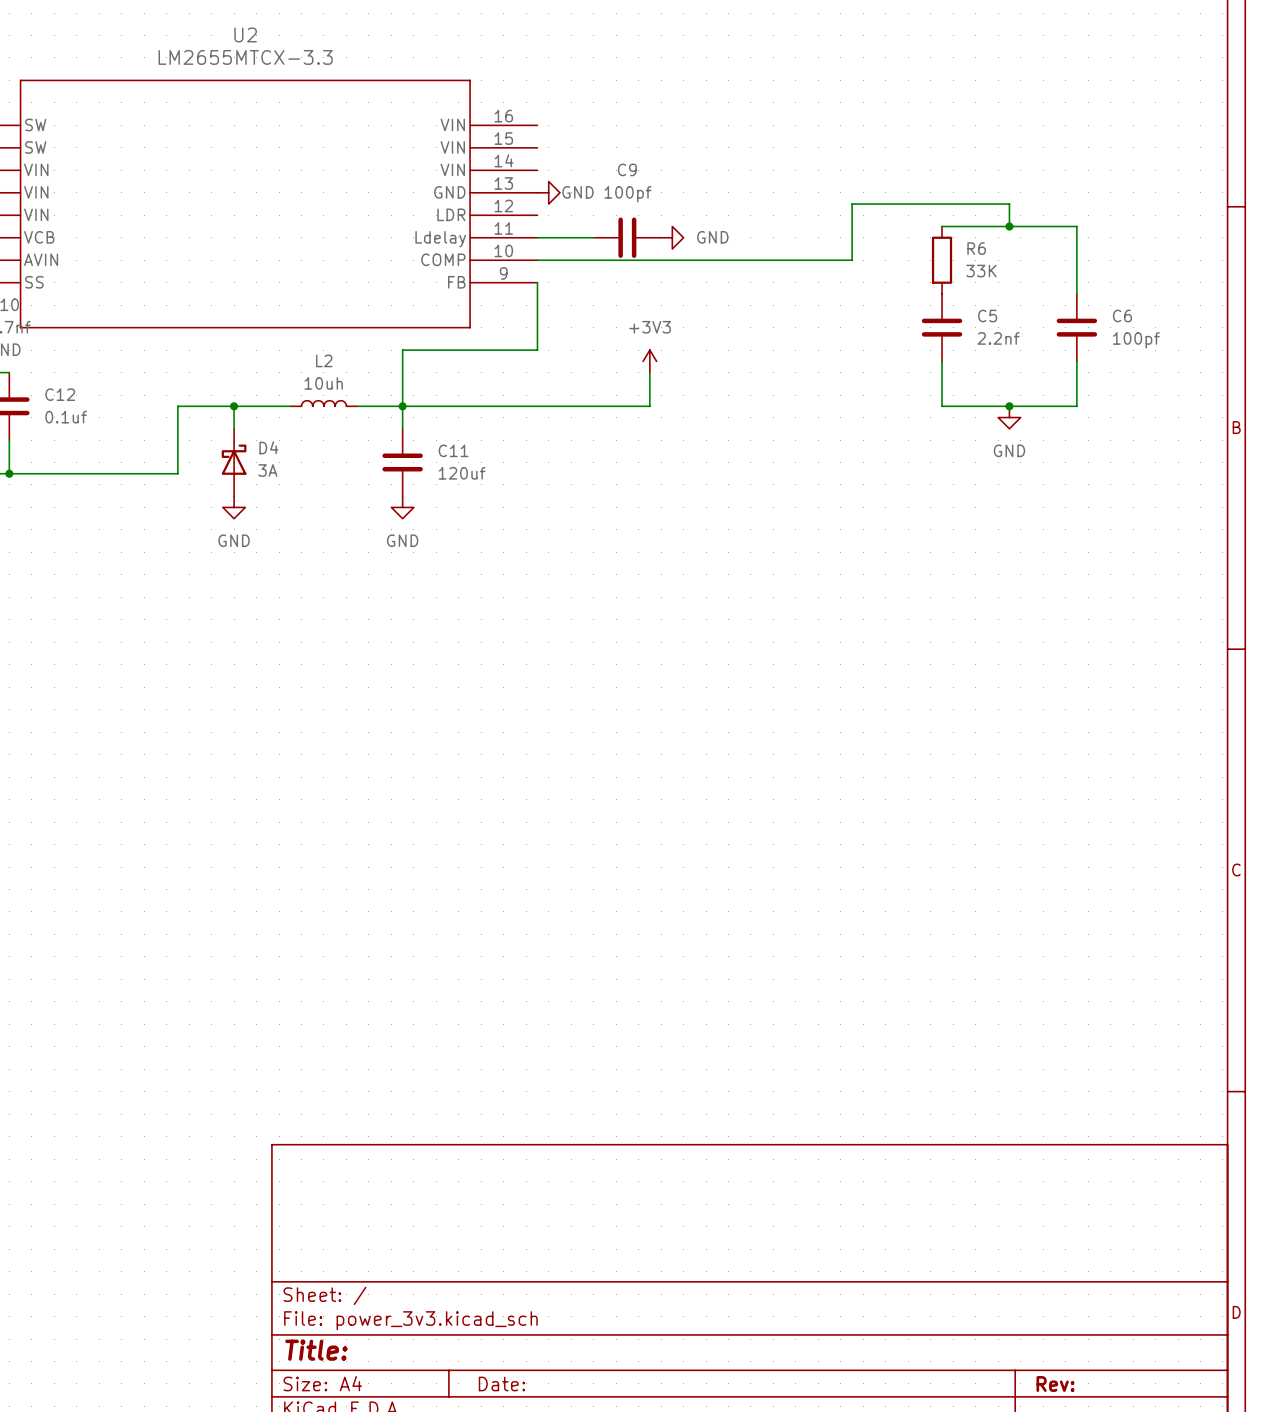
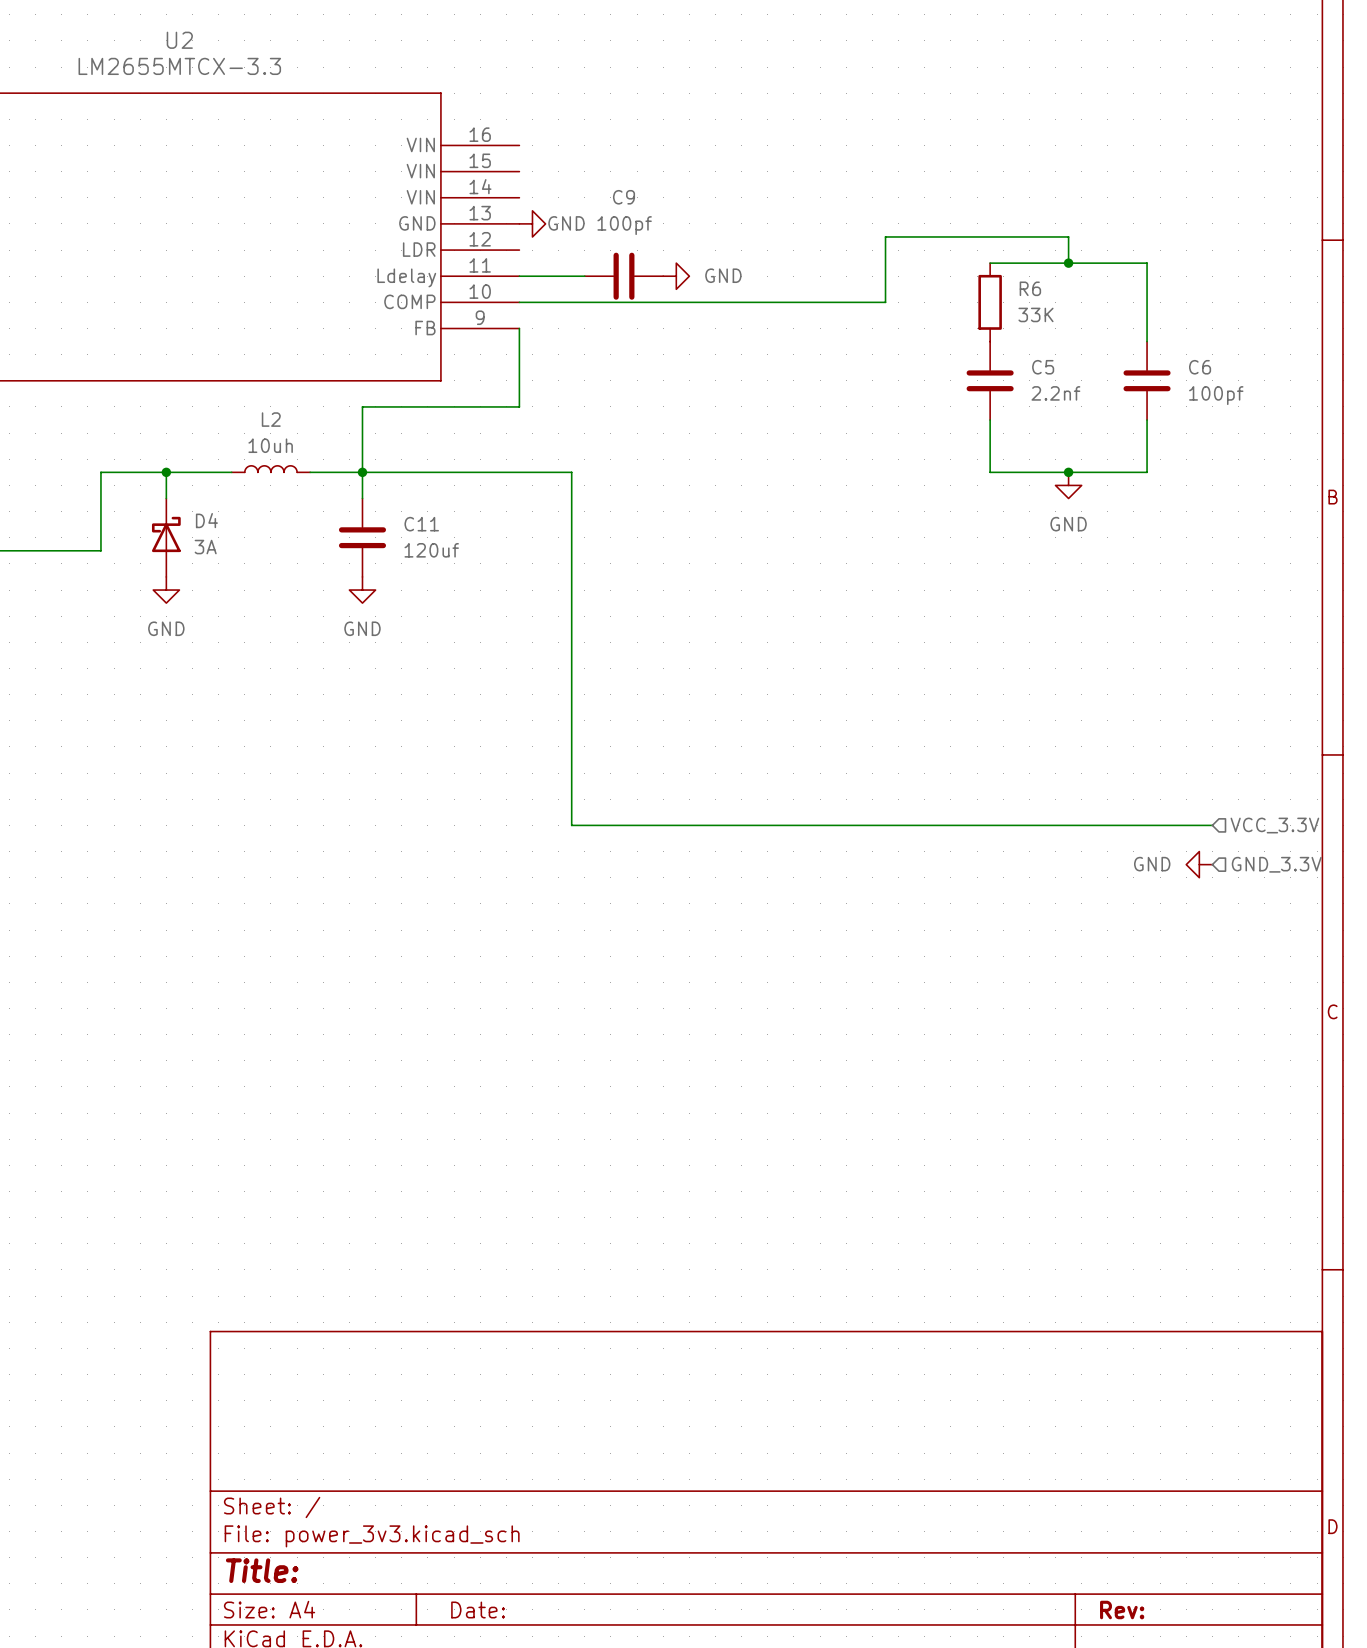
power symbol: +3V3 (649, 361) -> none
wire: (649, 372) (649, 406) (582, 406) -> (1212, 825) (571, 825) (571, 472)
hierarchical label: none -> VCC_3.3V (1274, 825)
power symbol: none -> GND (1199, 864)
hierarchical label: none -> GND_3.3V (1276, 864)

